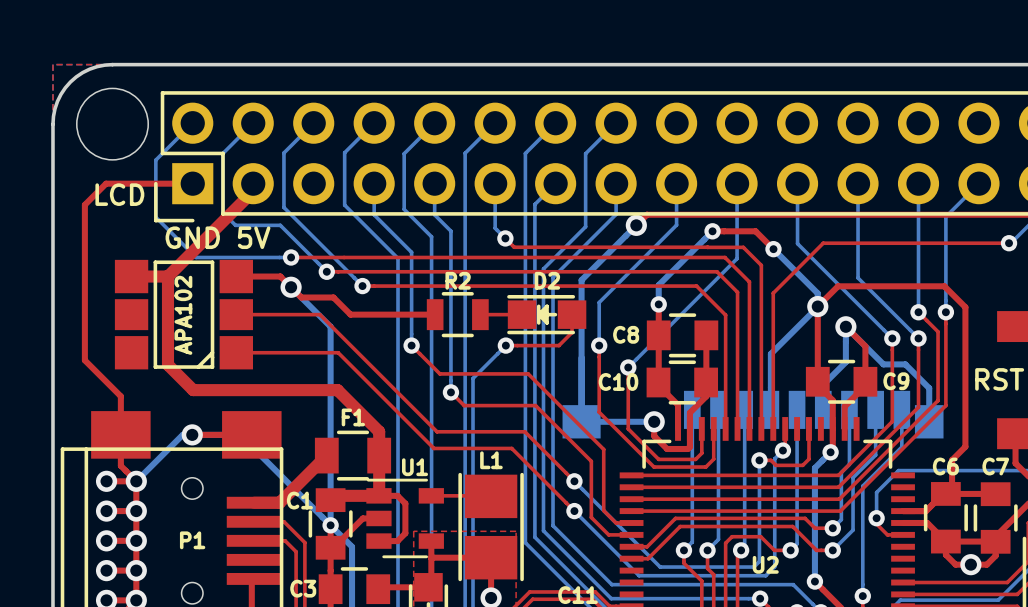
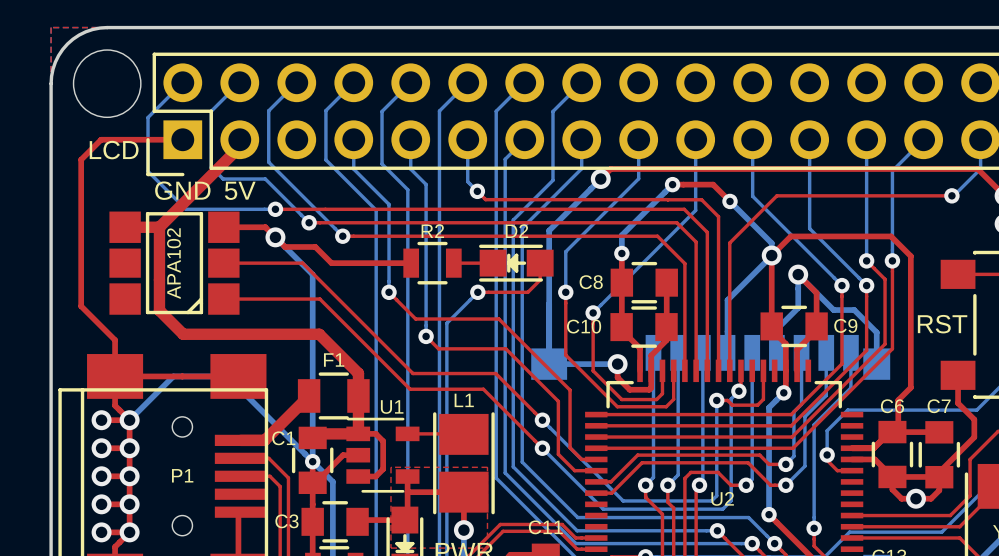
top track: none -> (115, 376) (182, 376)
via: (192, 434) -> none

